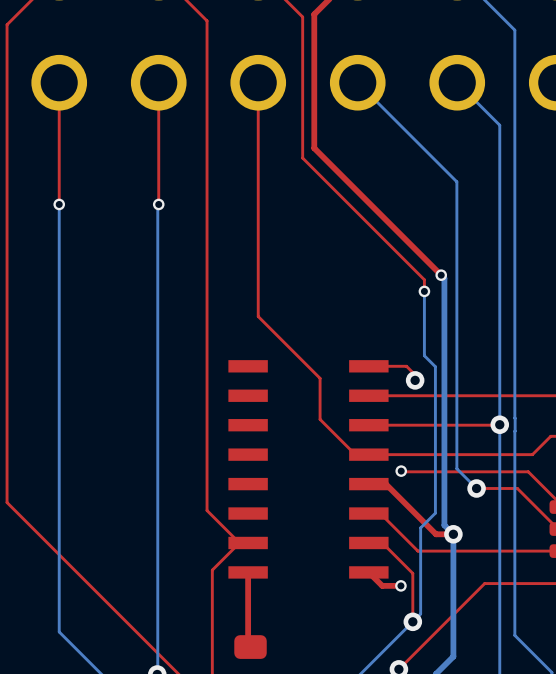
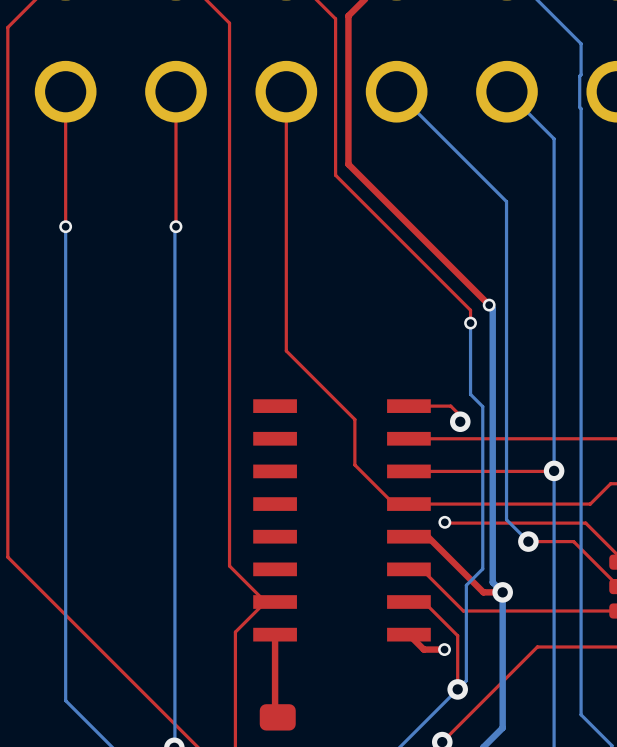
bottom track: (514, 30) (514, 418) -> (570, 33) (581, 43) (581, 714)
bottom track: (515, 418) (515, 431) -> none
bottom track: (514, 431) (514, 635) (524, 644) -> none

